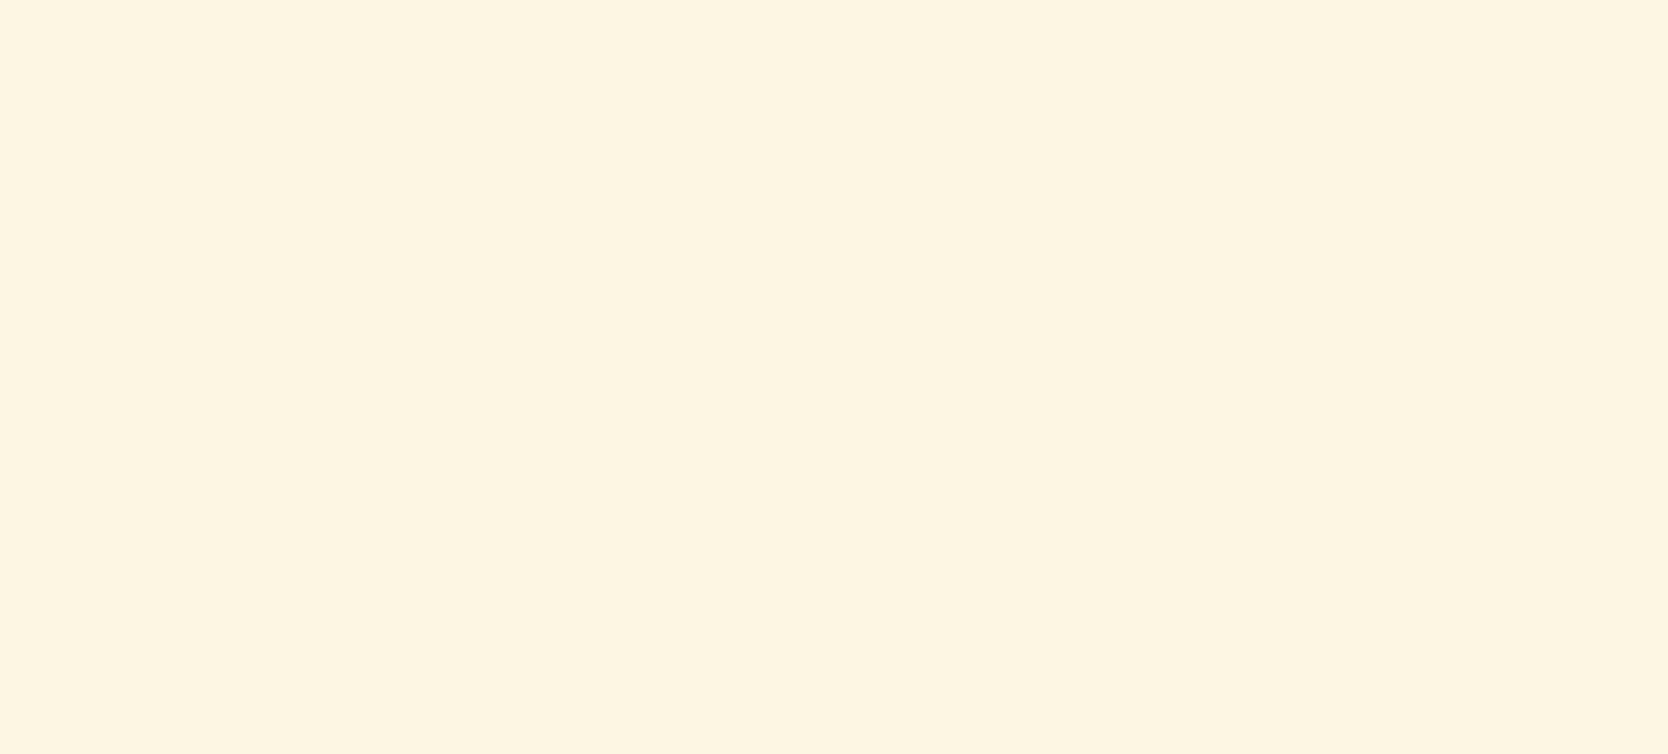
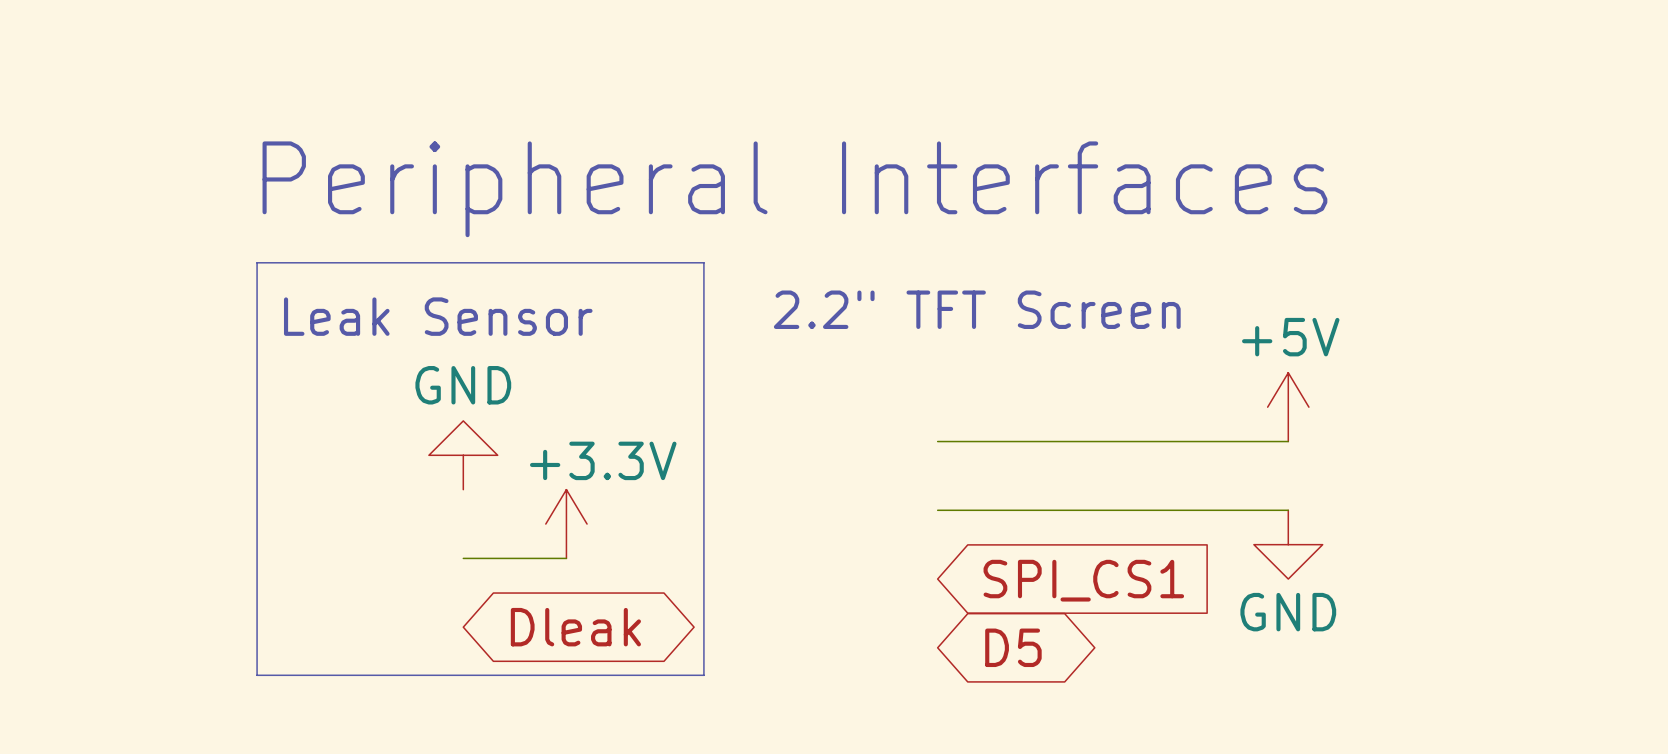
text: none -> Peripheral Interfaces (794, 189)
line: none -> (257, 262) (257, 675) (703, 675) (703, 262) (257, 262)
text: none -> 2.2" TFT Screen (977, 309)
text: none -> Leak Sensor (438, 316)
power symbol: none -> +5V (1288, 407)
wire: none -> (937, 441) (1288, 441)
power symbol: none -> GND (463, 455)
wire: none -> (937, 510) (1288, 510)
power symbol: none -> +3.3V (566, 524)
power symbol: none -> GND (1288, 544)
wire: none -> (463, 558) (566, 558)
global label: none -> SPI_CS1 (1083, 580)
global label: none -> Dleak (575, 627)
global label: none -> D5 (1013, 647)

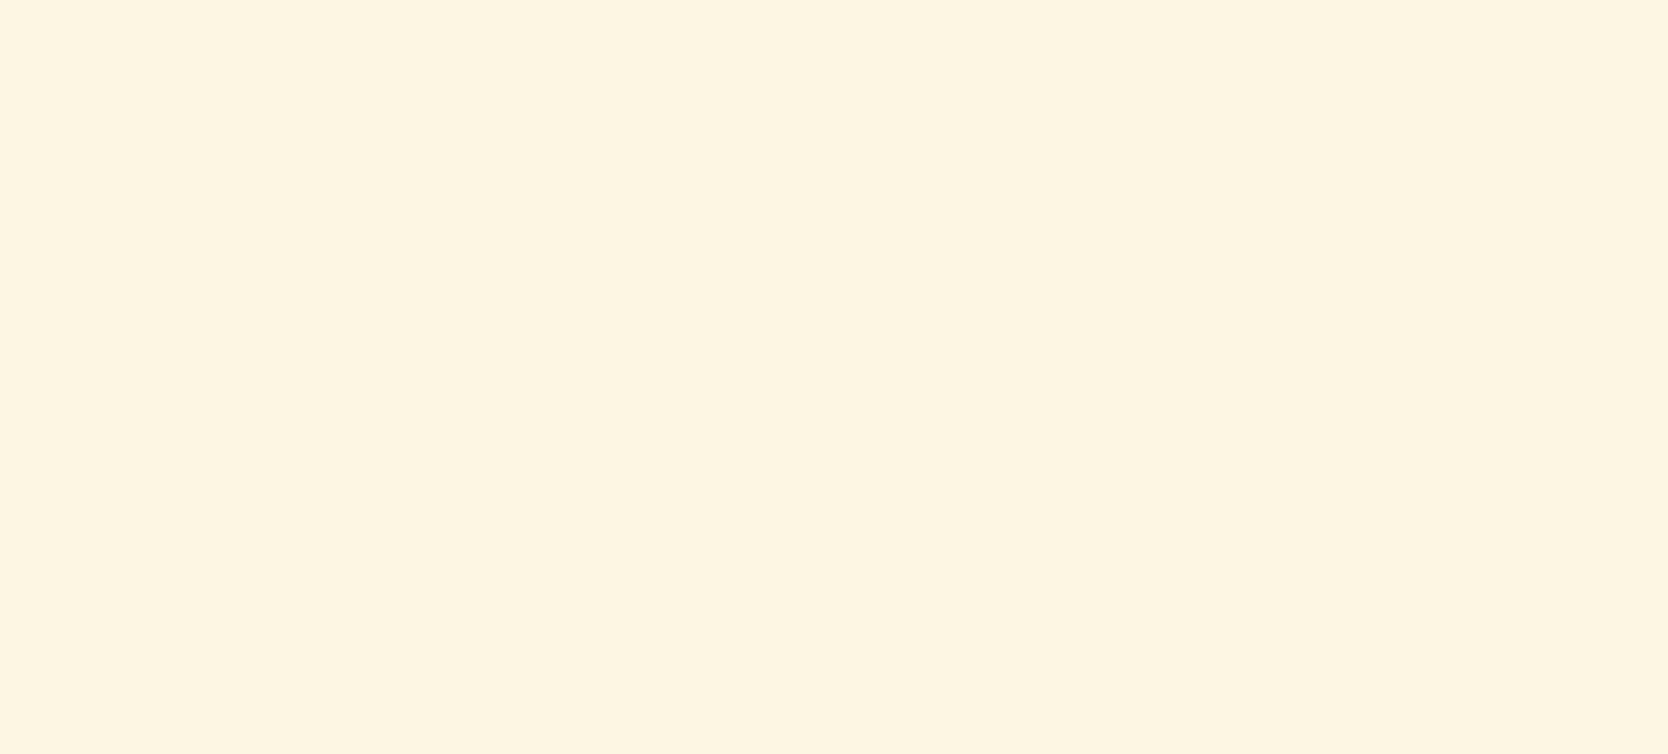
text: Peripheral Interfaces (794, 189) -> none
line: (257, 262) (257, 675) (703, 675) (703, 262) (257, 262) -> none
text: 2.2" TFT Screen (977, 309) -> none
text: Leak Sensor (438, 316) -> none
power symbol: +5V (1288, 407) -> none
wire: (937, 441) (1288, 441) -> none
power symbol: GND (463, 455) -> none
wire: (937, 510) (1288, 510) -> none
power symbol: +3.3V (566, 524) -> none
power symbol: GND (1288, 544) -> none
wire: (463, 558) (566, 558) -> none
global label: SPI_CS1 (1083, 580) -> none
global label: Dleak (575, 627) -> none
global label: D5 (1013, 647) -> none

